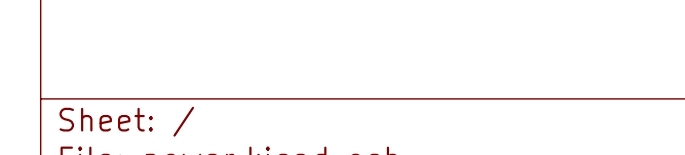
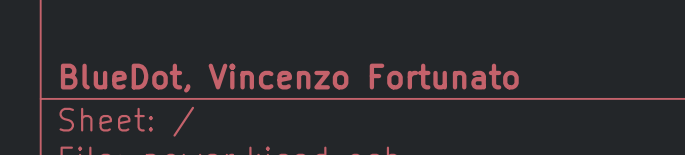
title block: none -> BlueDot, Vincenzo Fortunato (289, 78)

